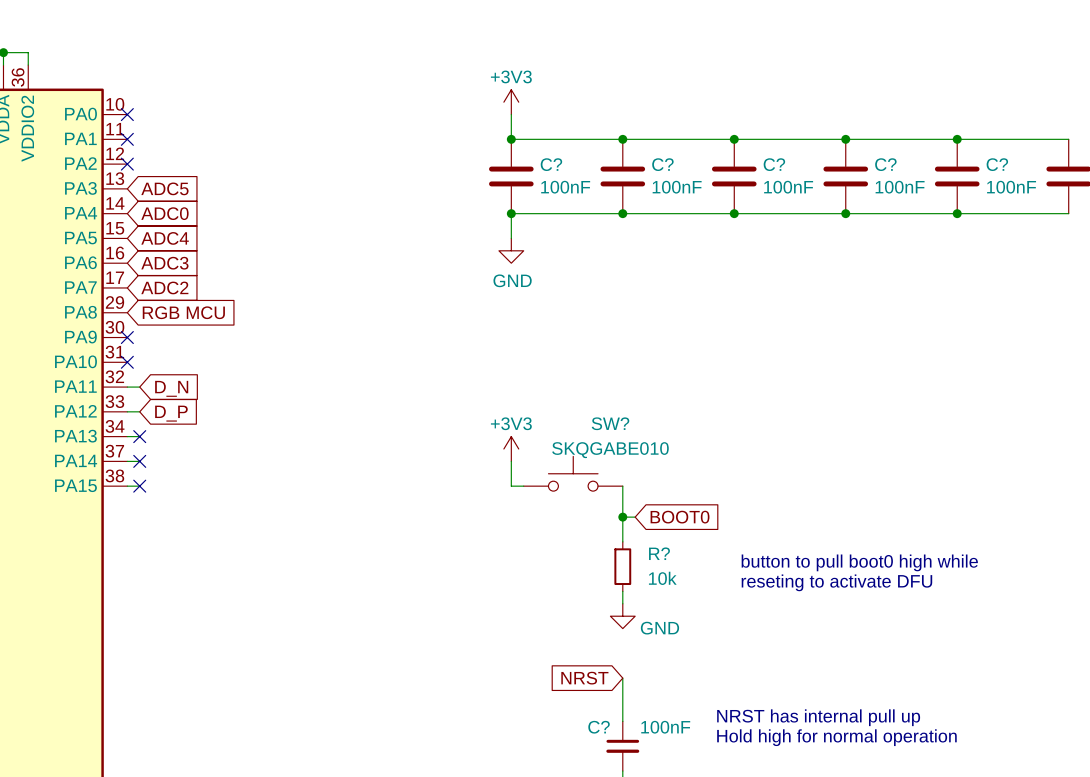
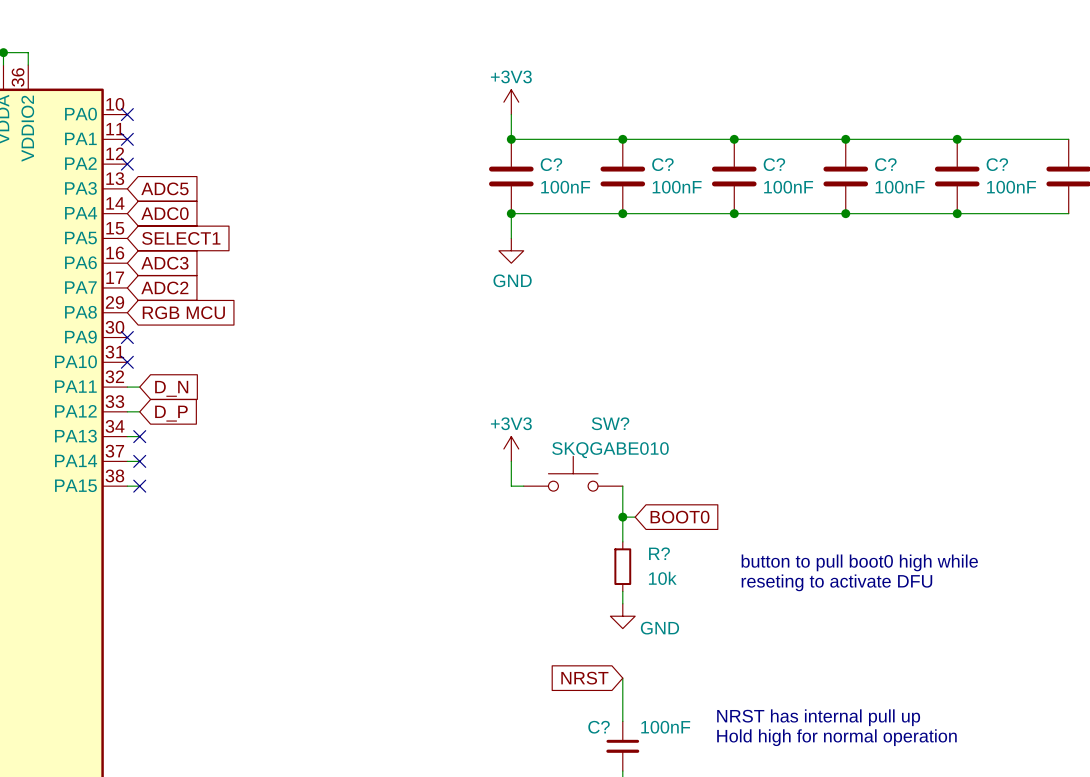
global label: ADC4 (165, 238) -> SELECT1 (181, 238)

